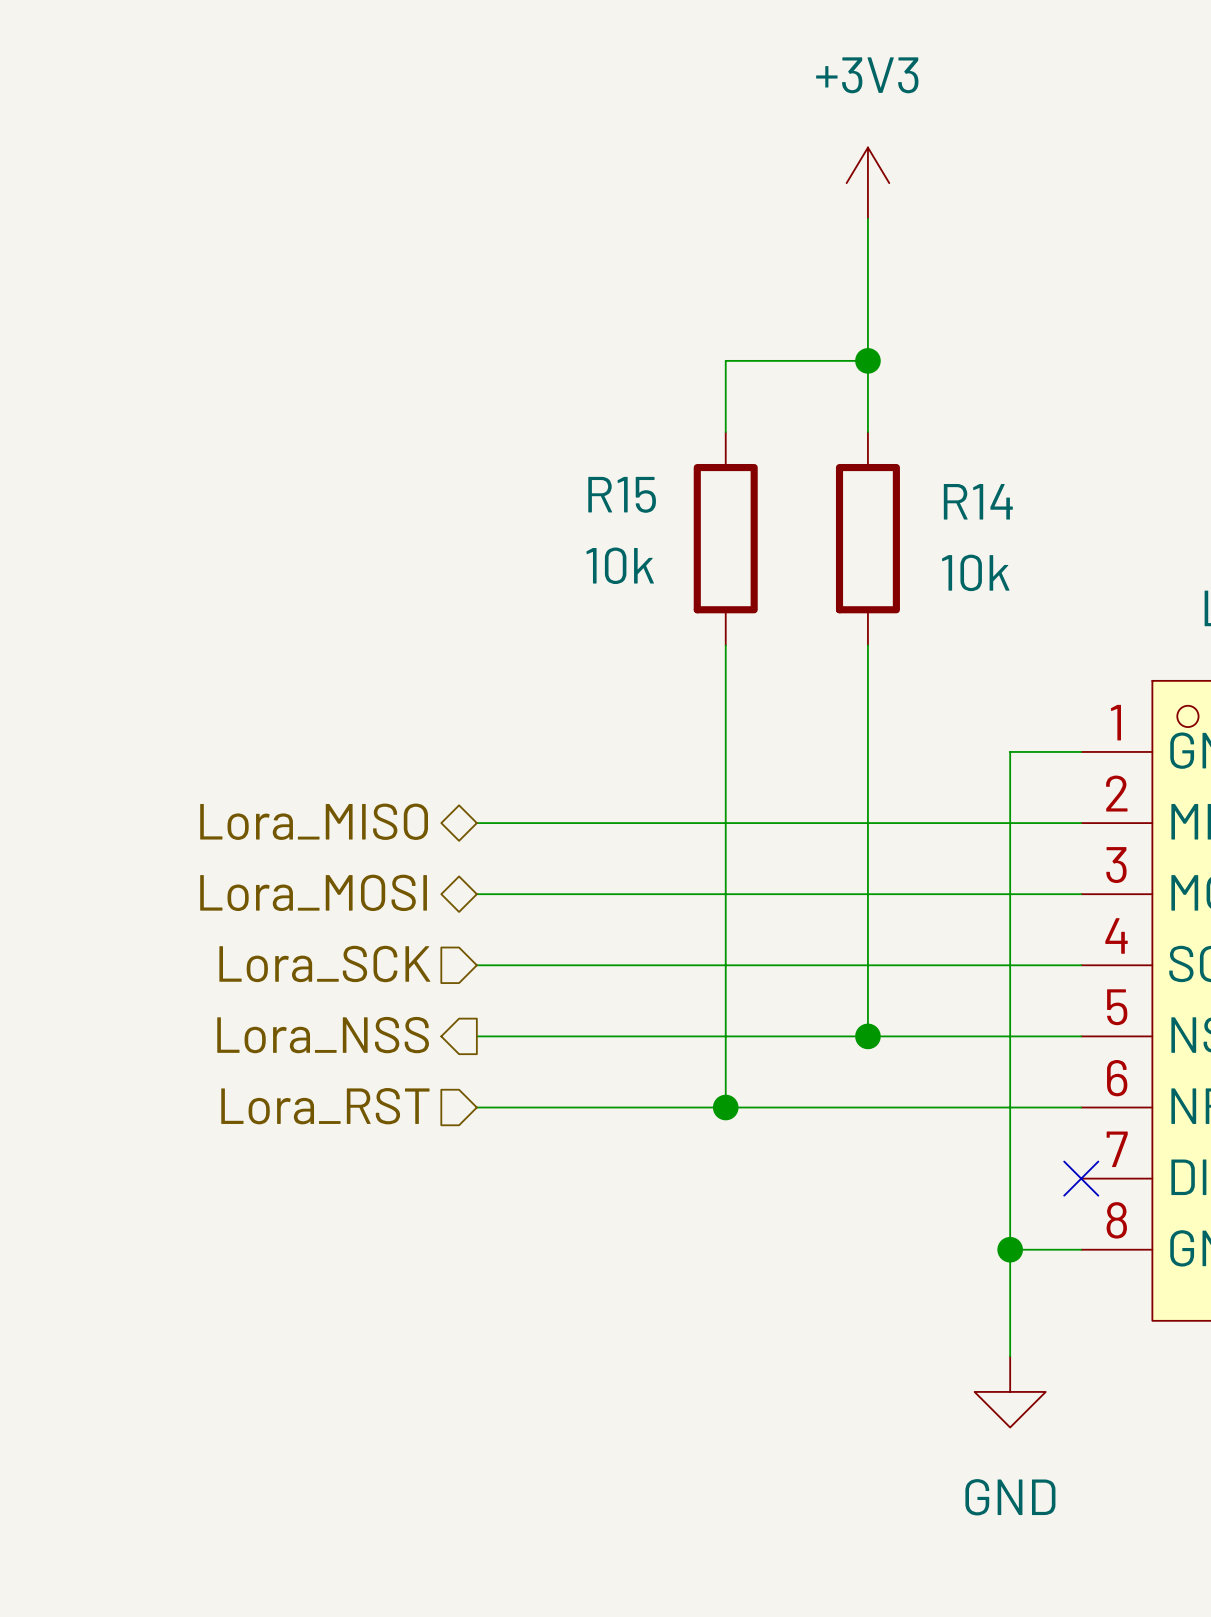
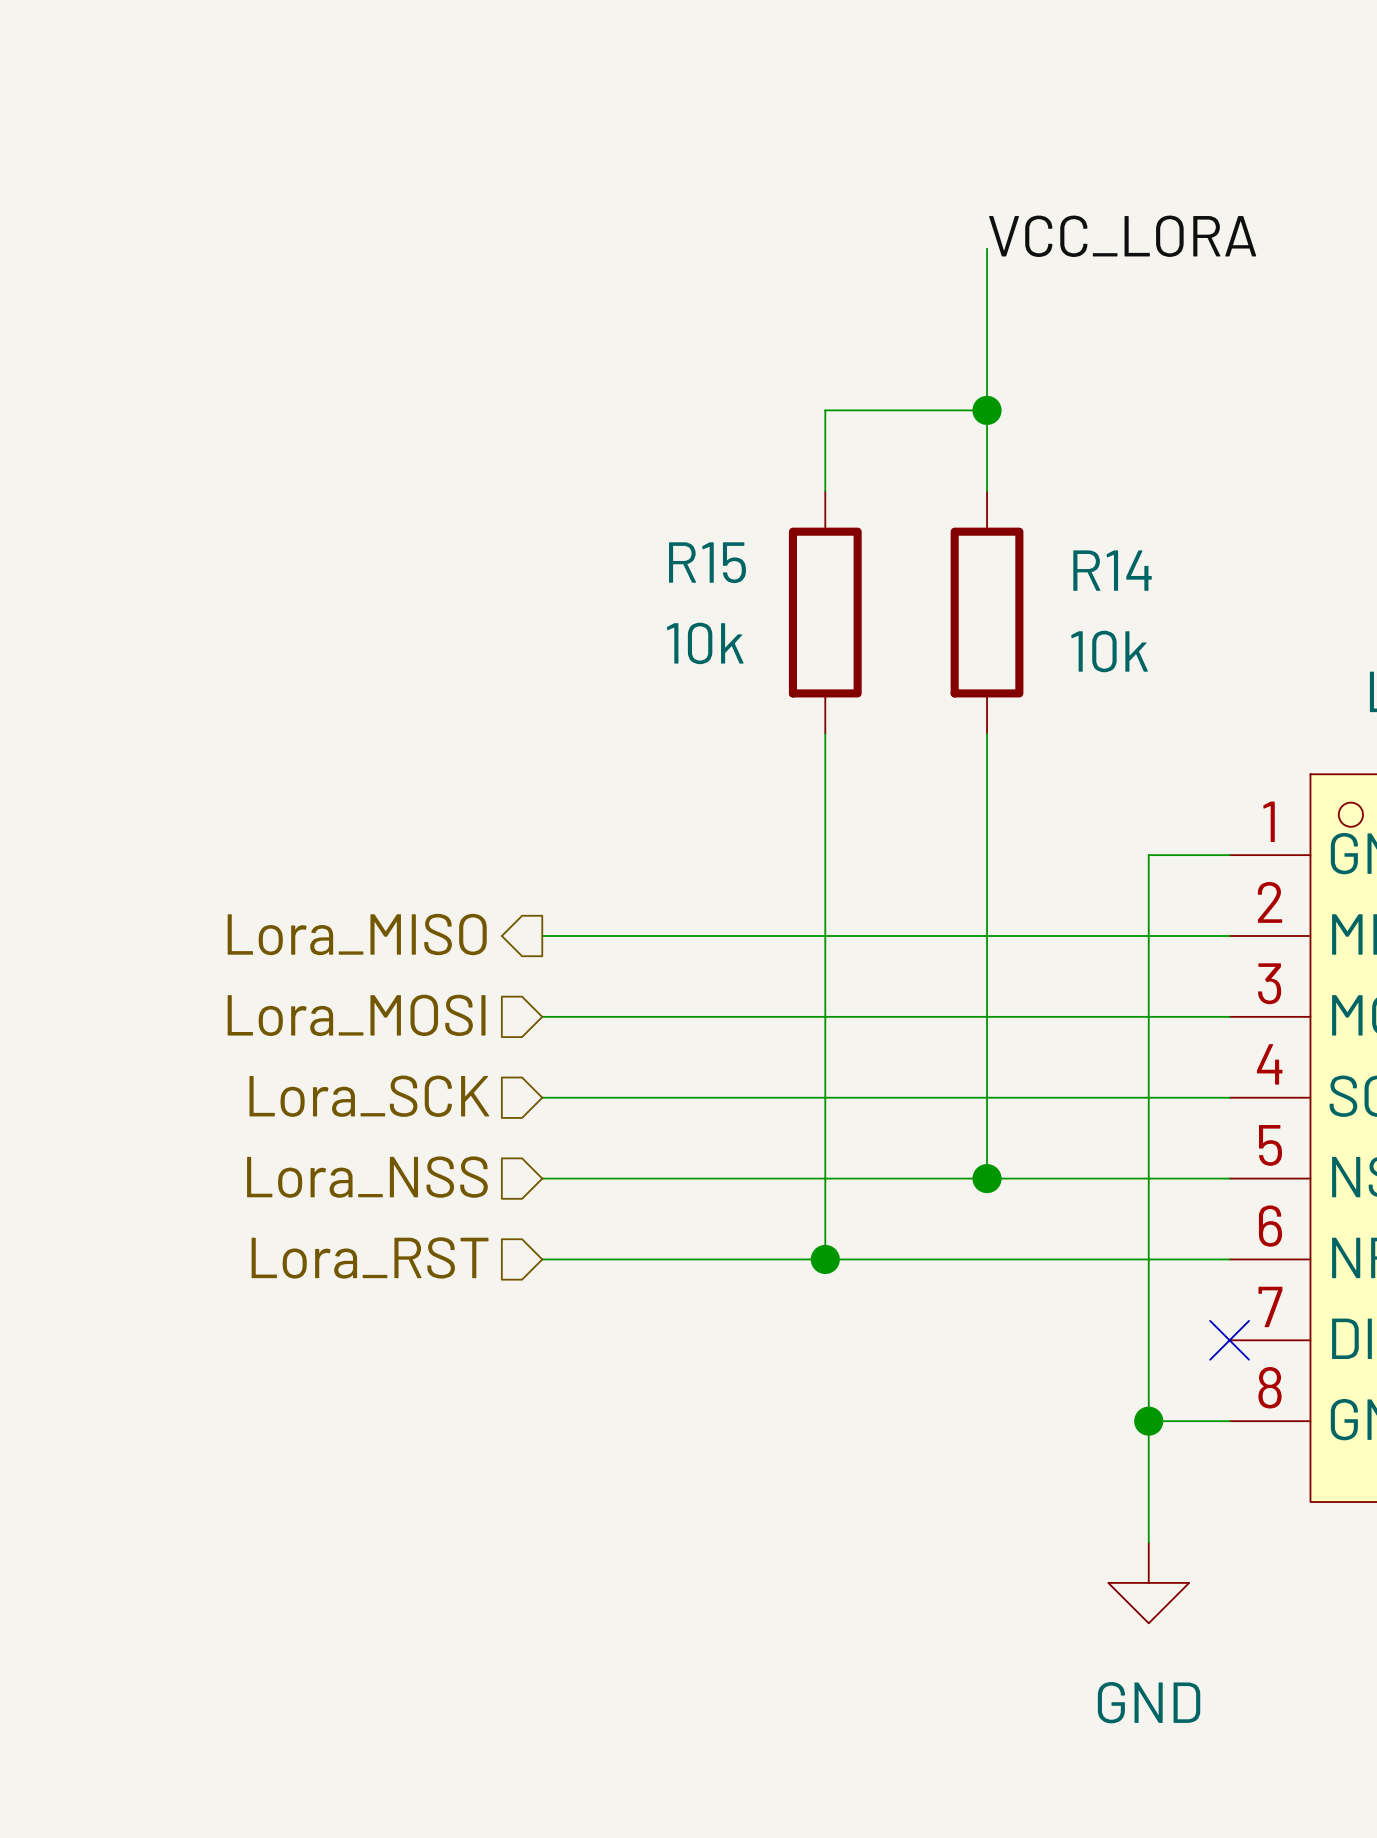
power symbol: +3V3 (867, 183) -> none
label: none -> VCC_LORA (1122, 236)
hierarchical label shape: bidirectional (314, 821) -> output (357, 934)
hierarchical label shape: bidirectional (313, 892) -> input (356, 1015)
hierarchical label shape: output (323, 1035) -> input (367, 1177)

